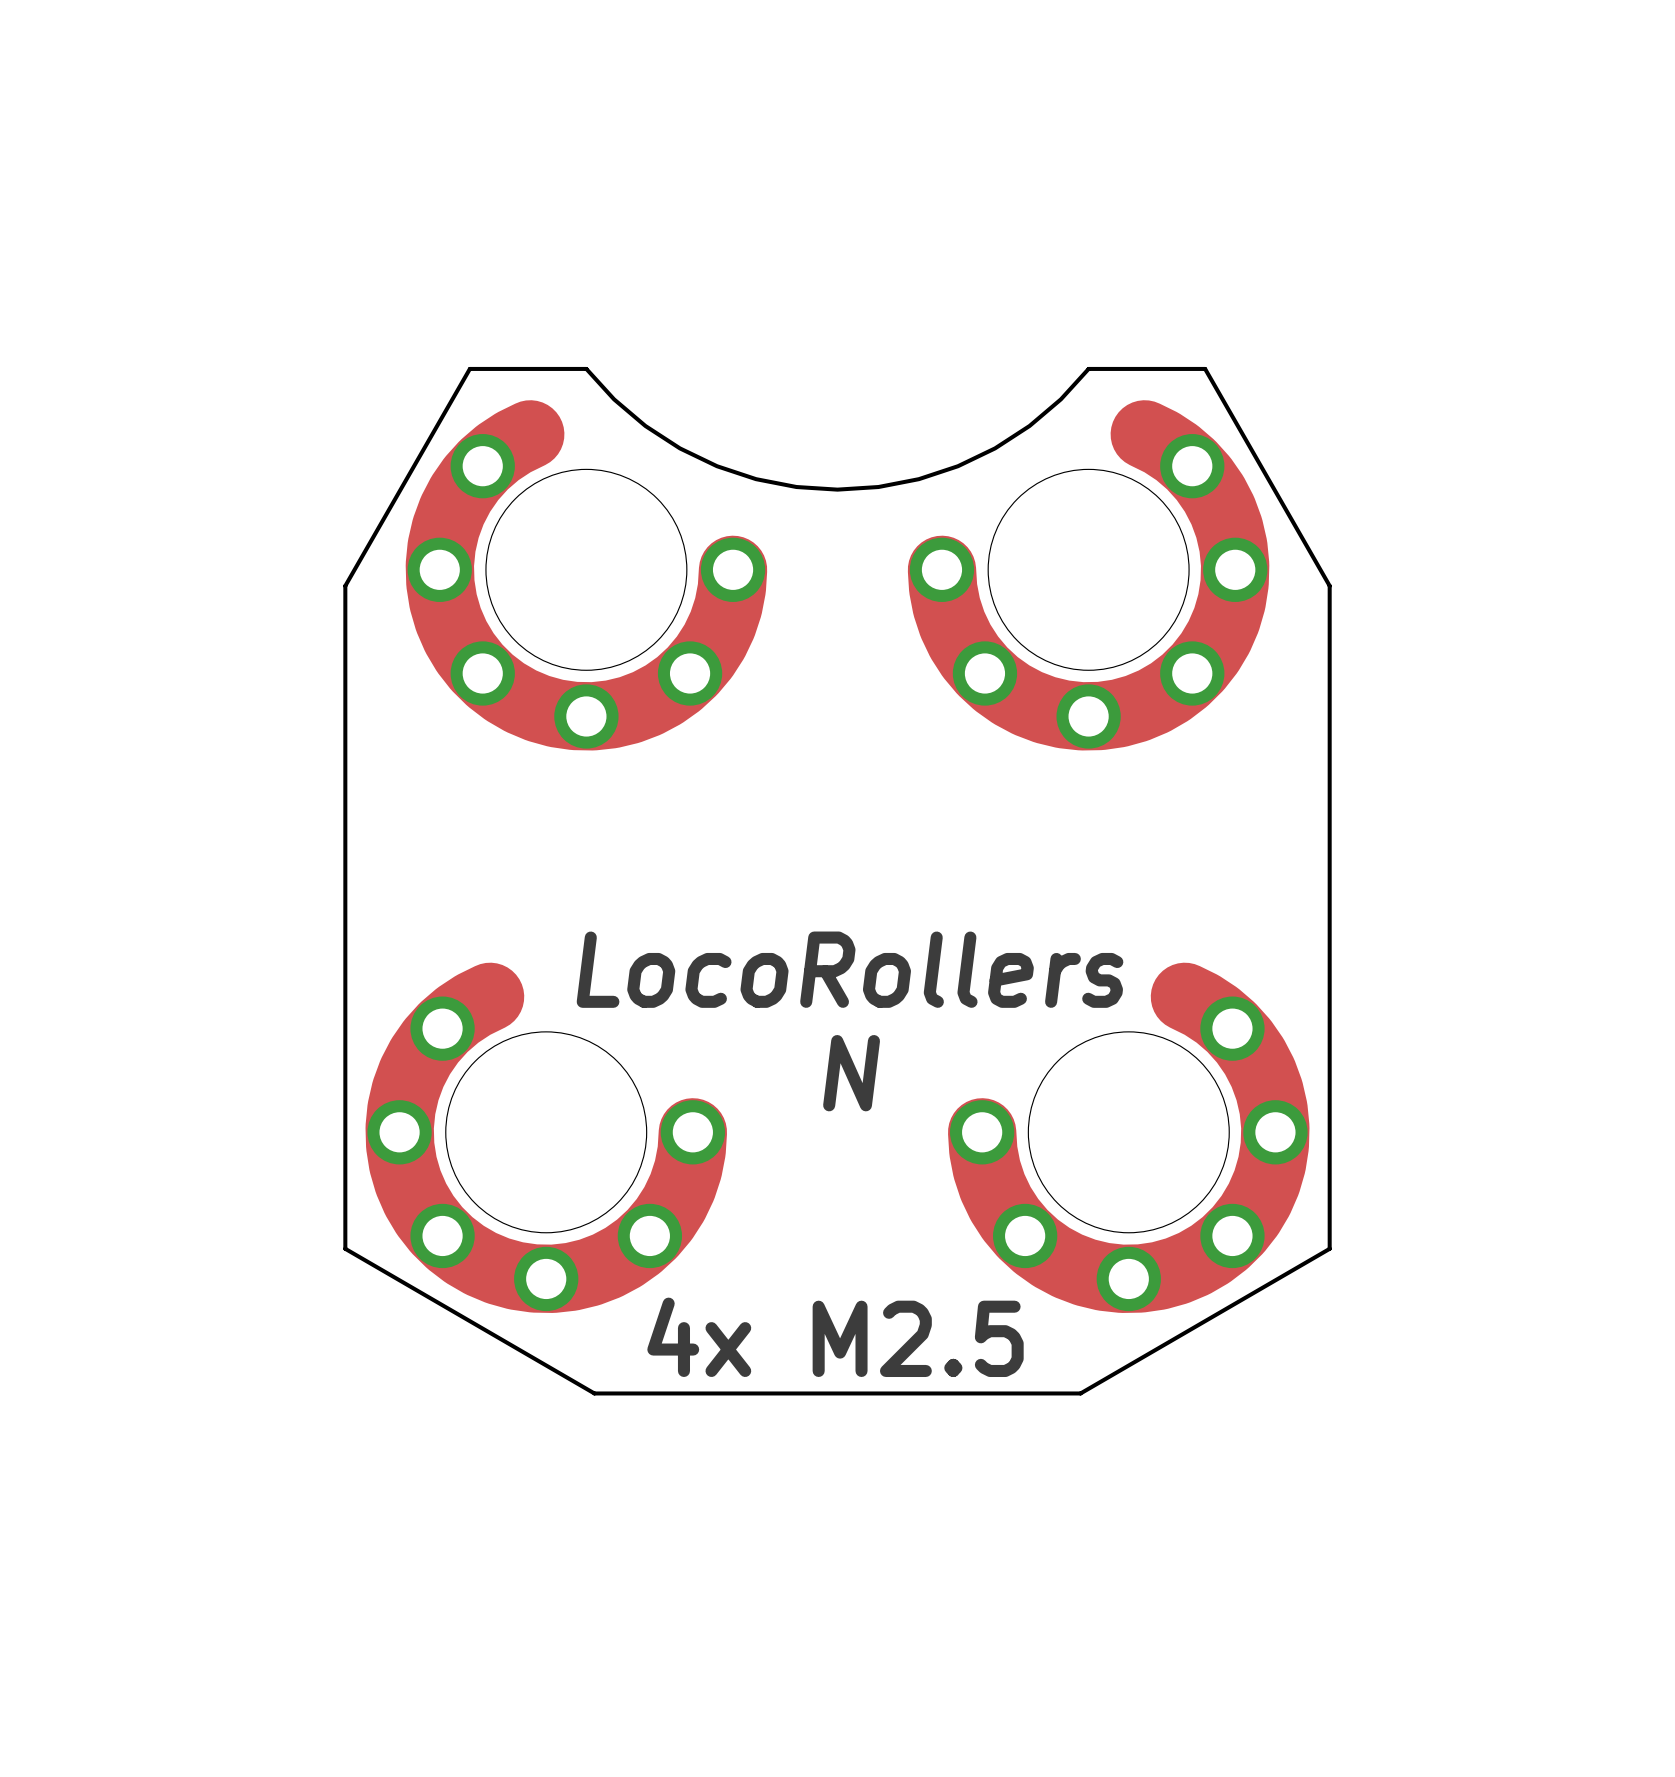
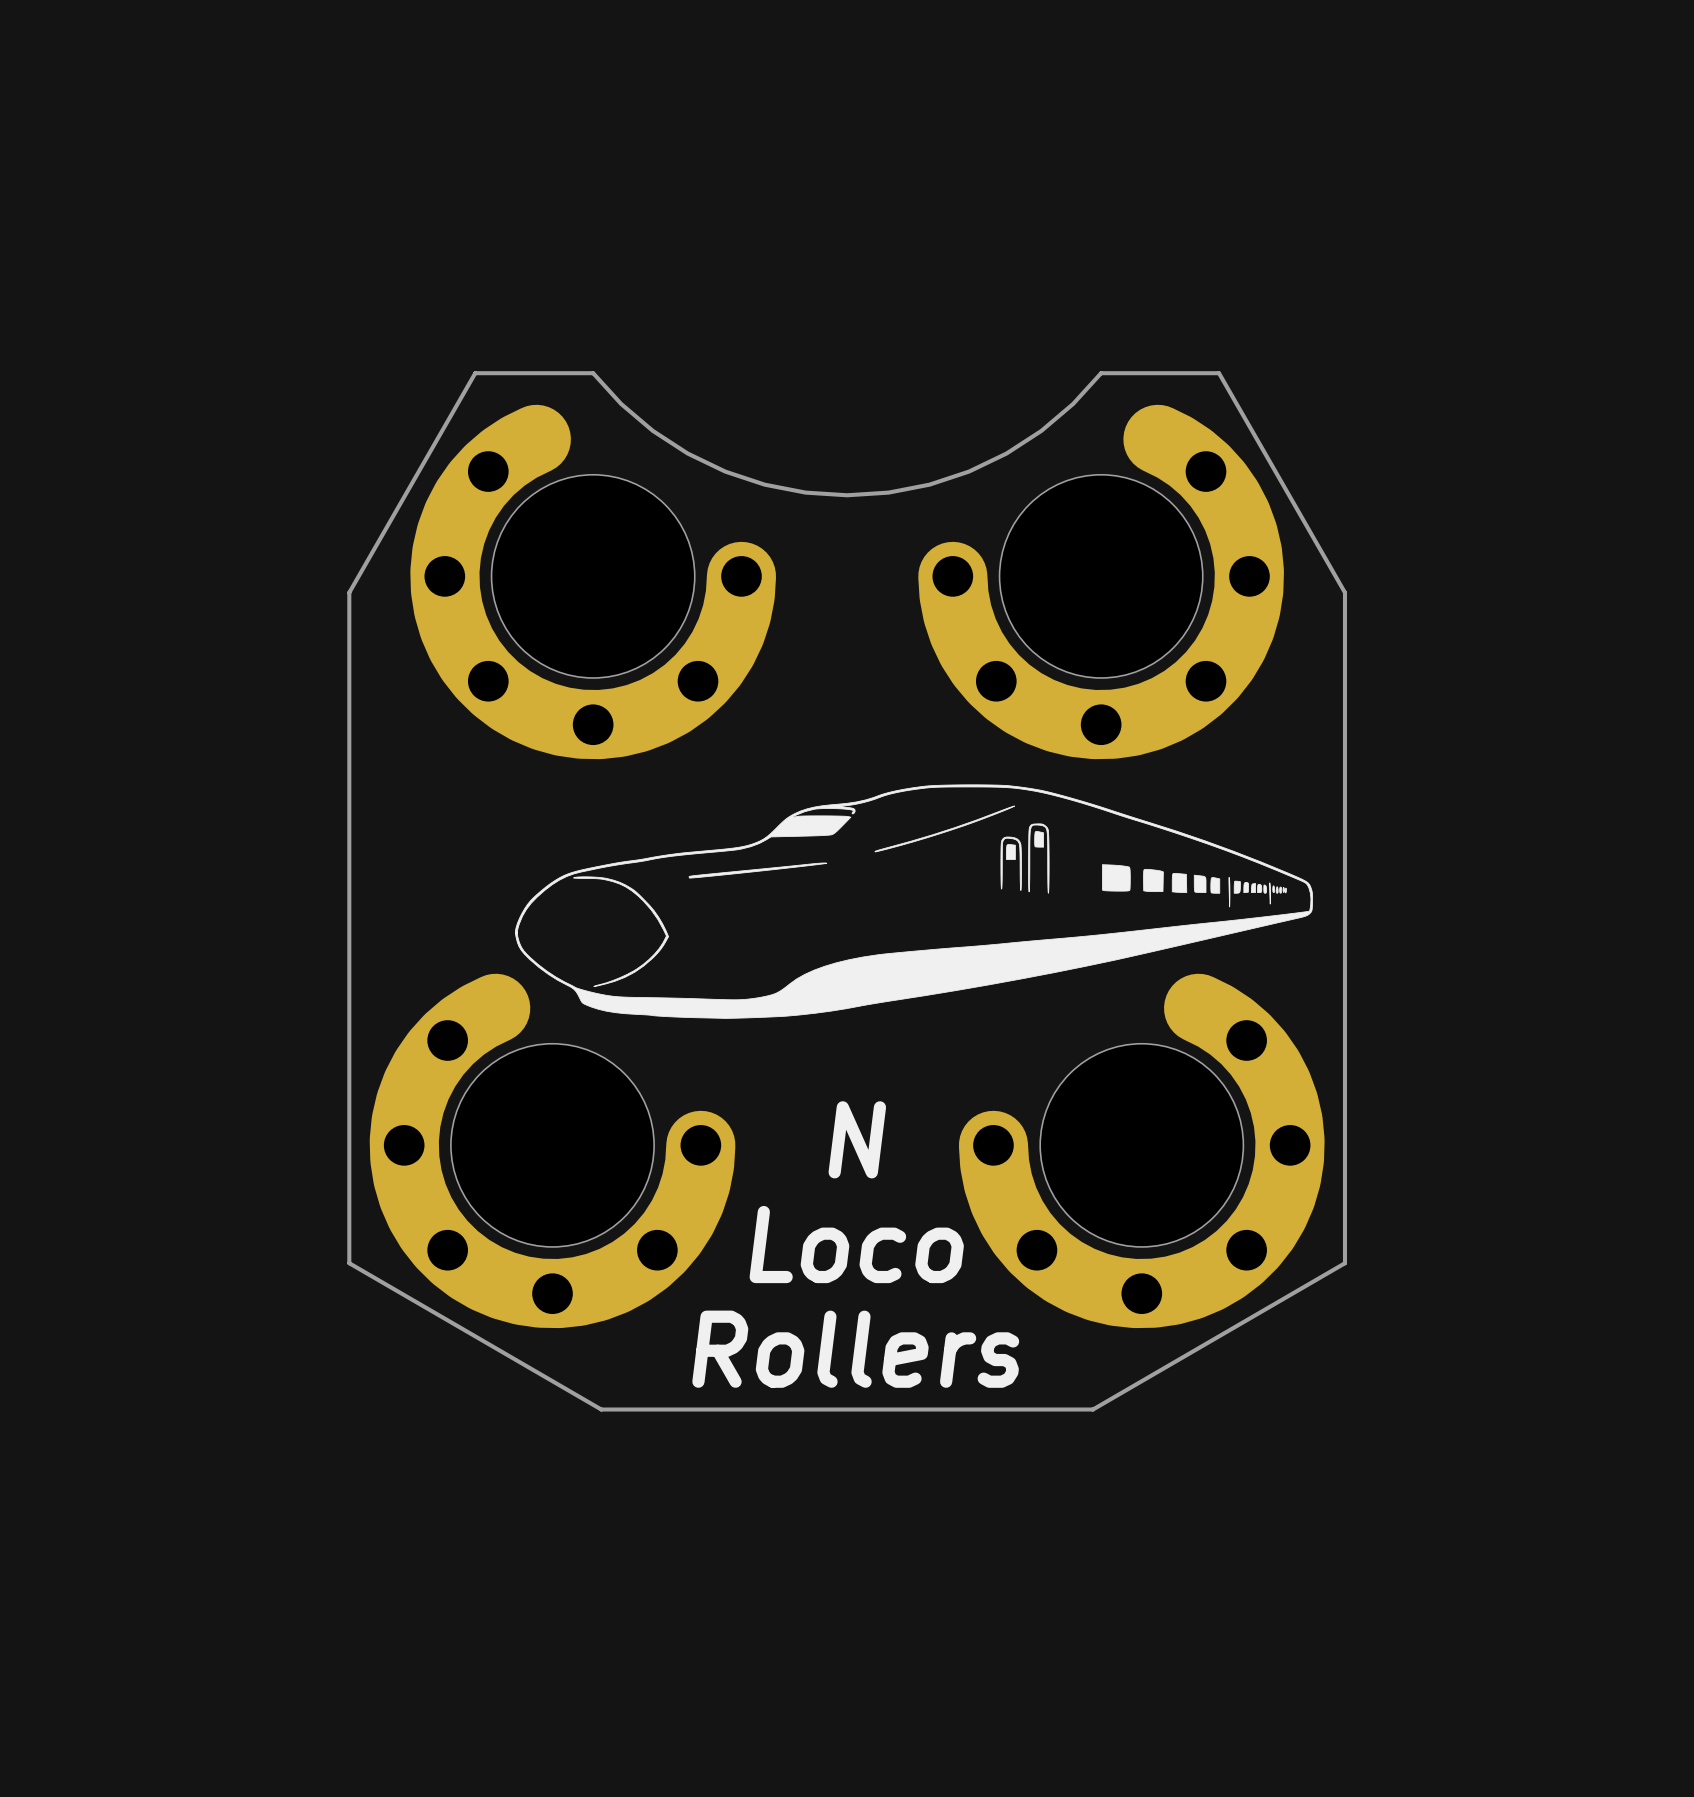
drawing: none -> [515, 784, 1314, 1019]
text: LocoRollers (850, 969) -> none
text position: N (851, 1073) -> N (857, 1139)
text: none -> Loco (856, 1244)
text: 4x M2.5 (835, 1337) -> Rollers (855, 1349)

